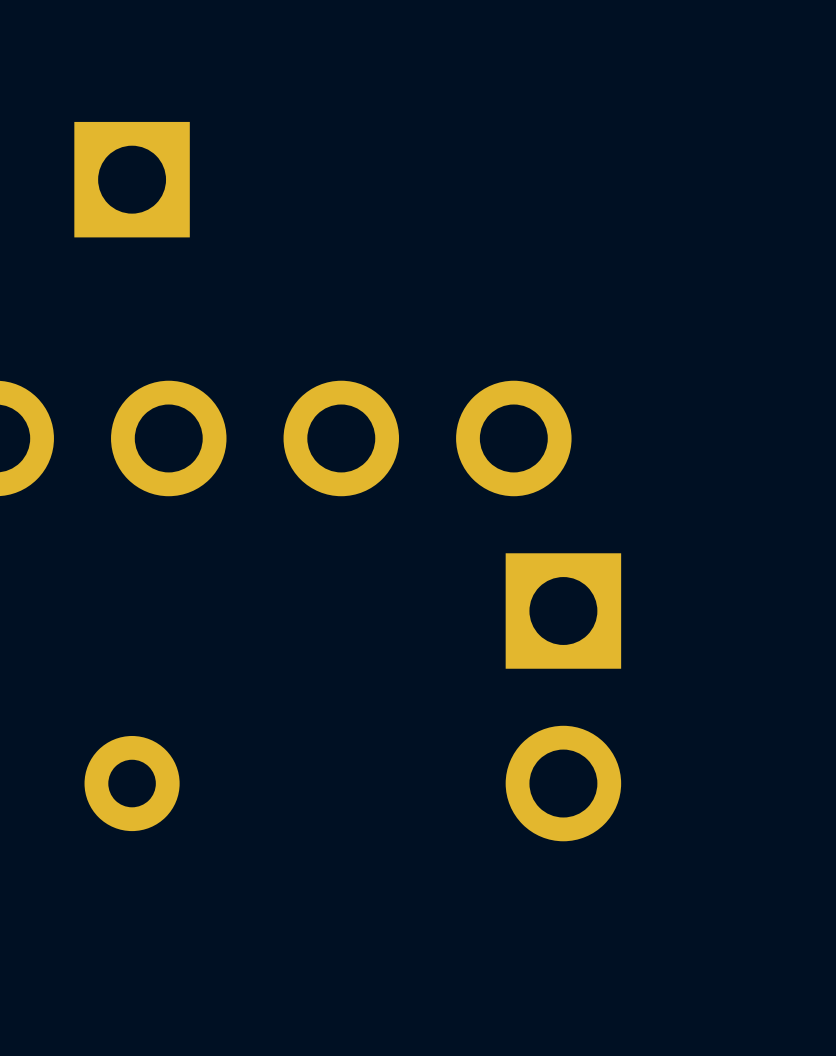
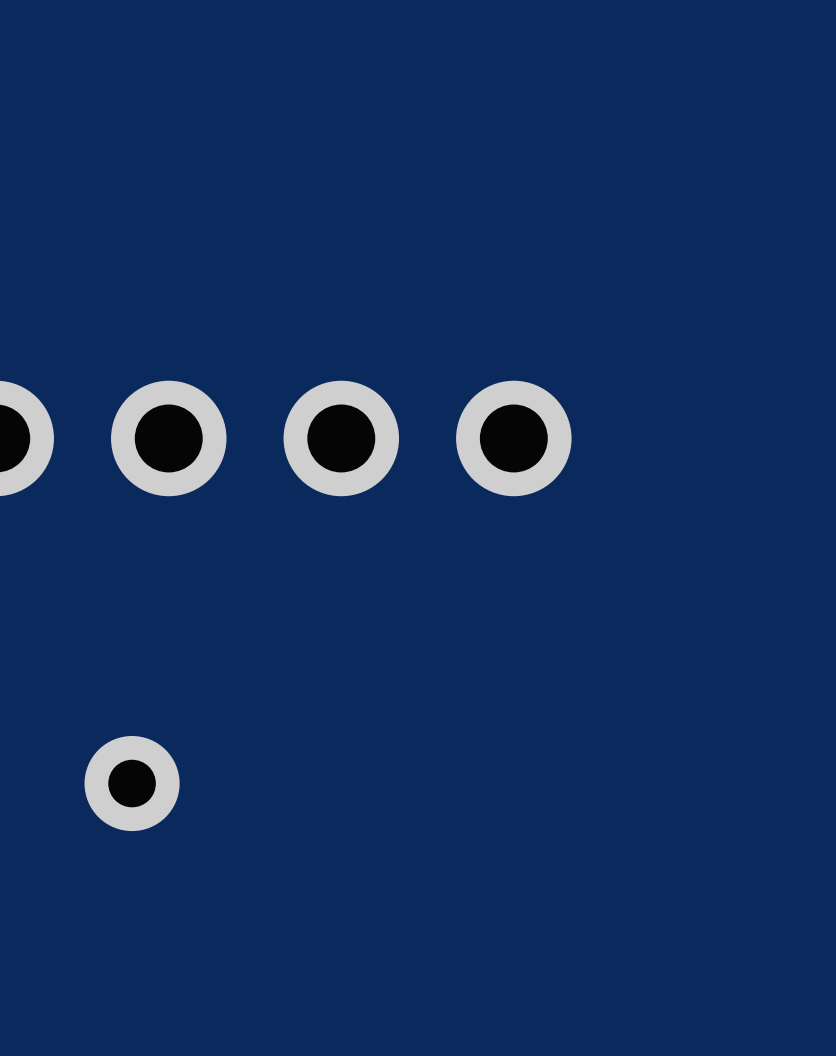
part: (132, 179) -> none
part: (563, 697) -> none

